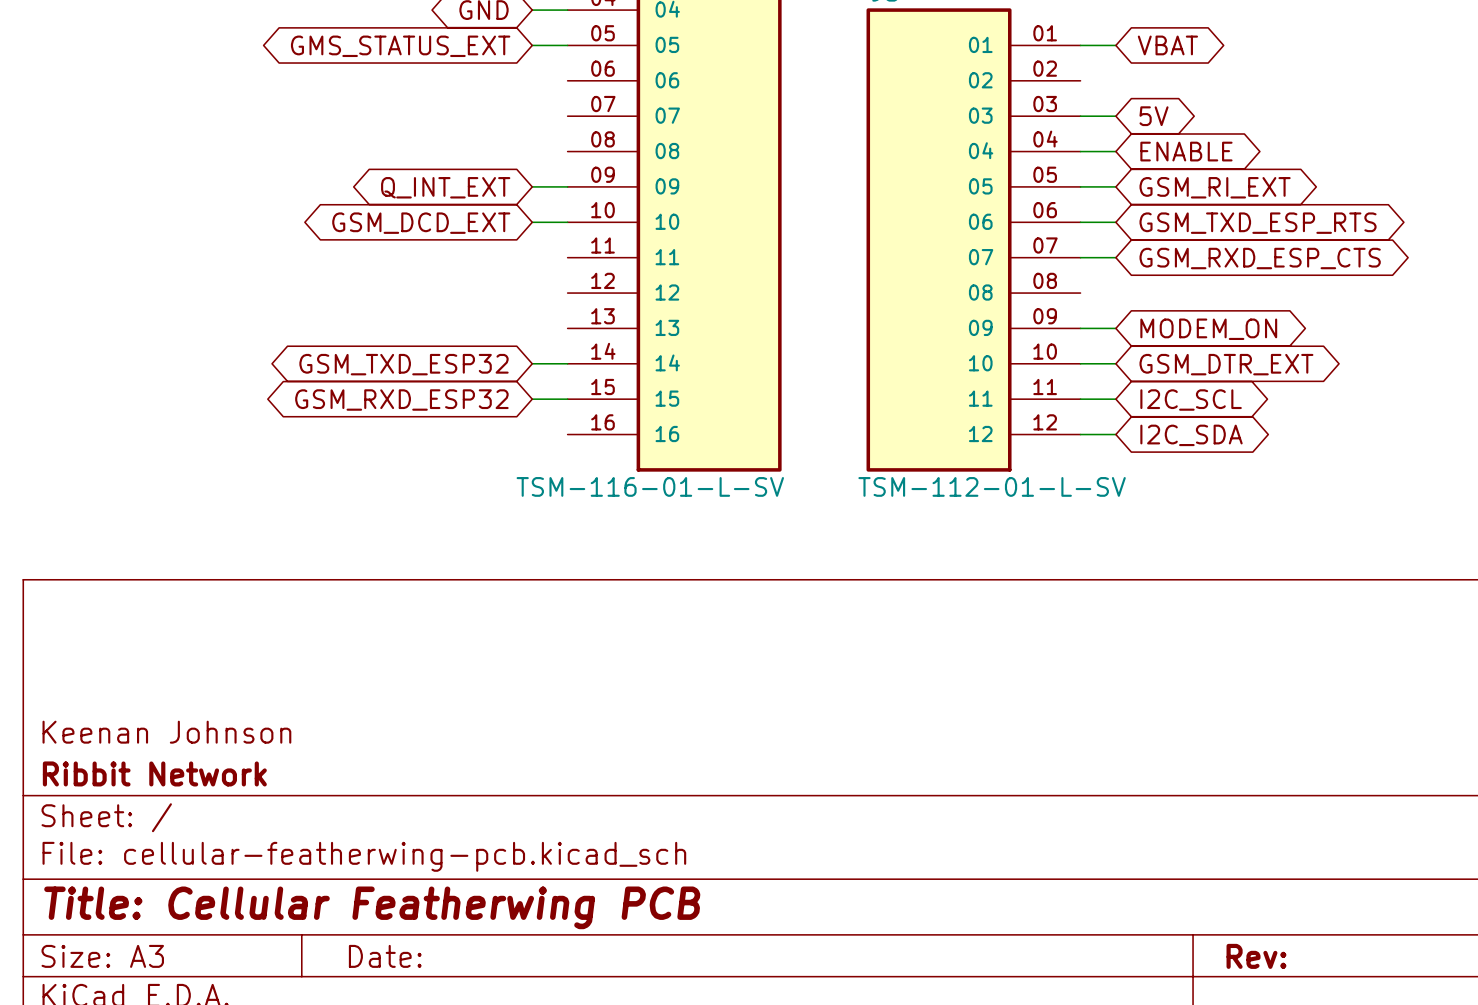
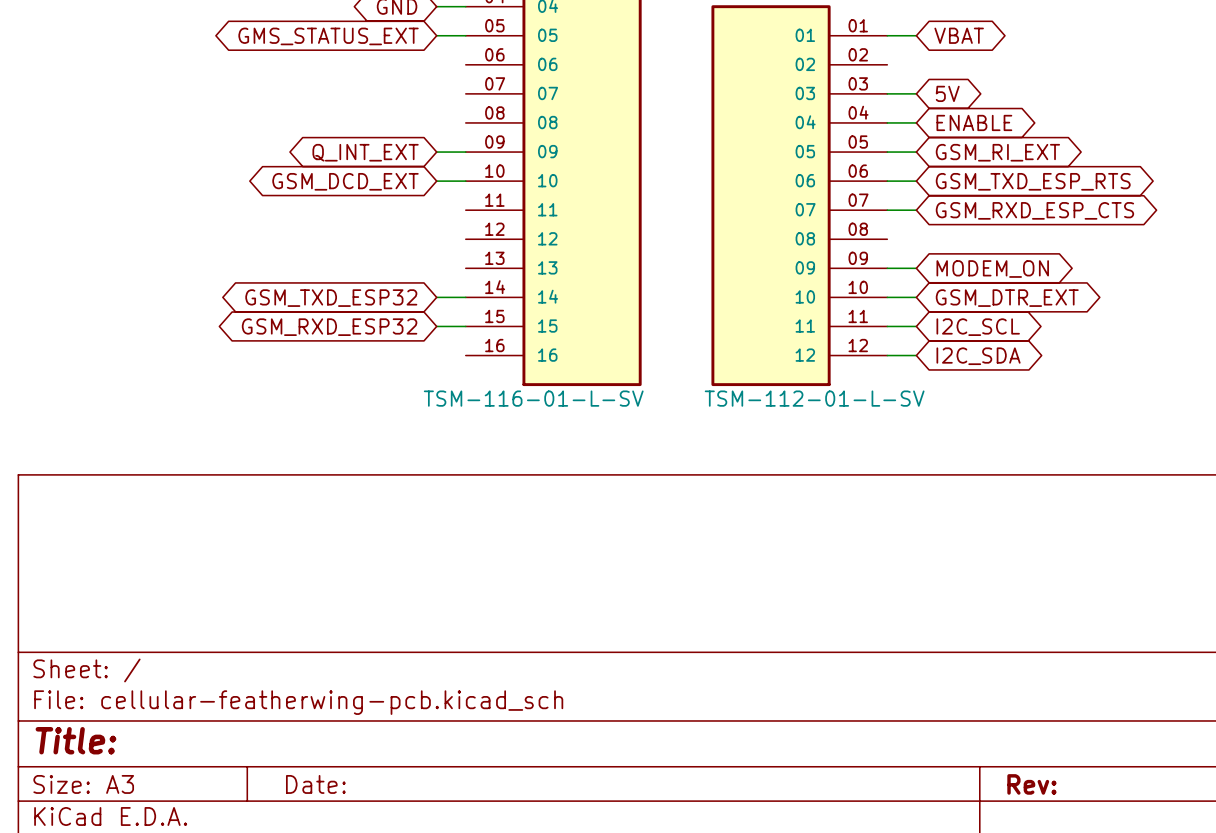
title block: Keenan Johnson (166, 732) -> none
title block: Ribbit Network (154, 773) -> none
title block: Title: Cellular Featherwing PCB (372, 907) -> Title: (75, 740)

